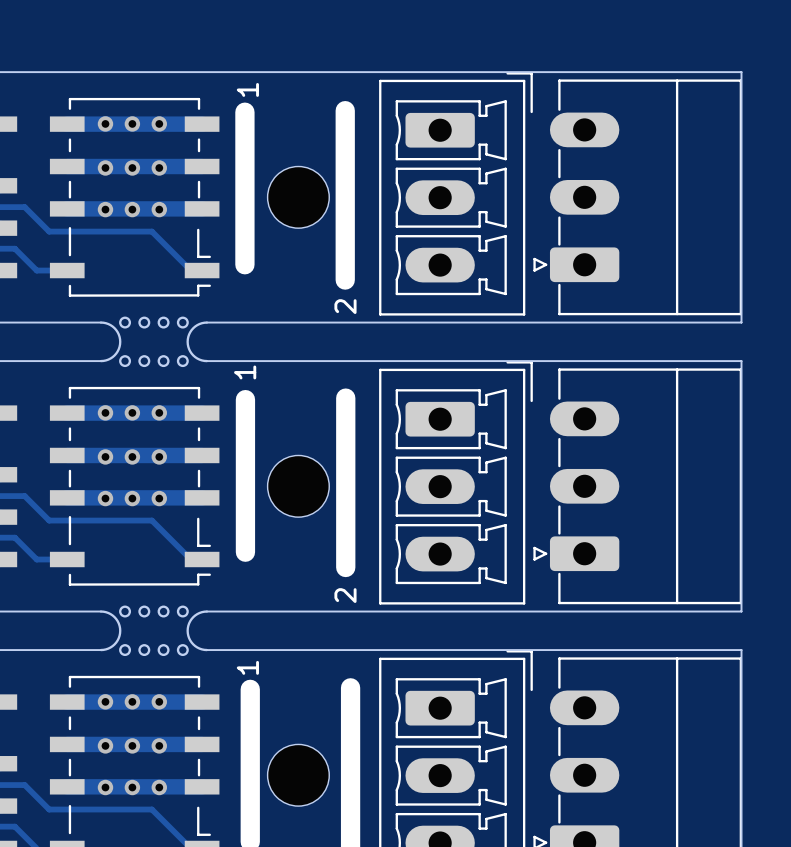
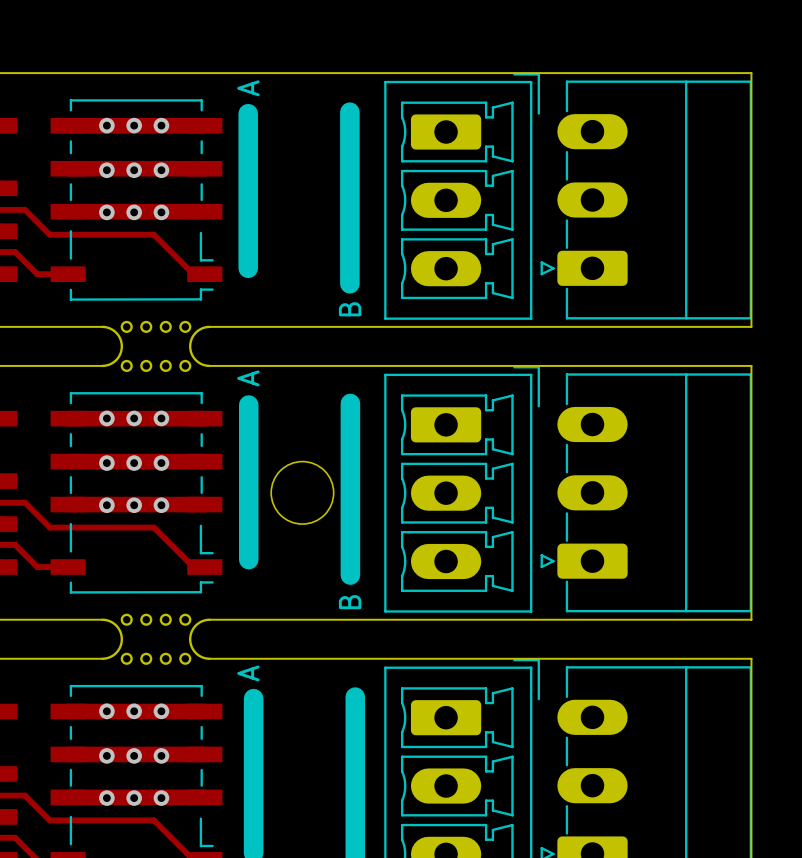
text: 1 (247, 89) -> A (248, 88)
part: (298, 197) -> none
text: 2 (345, 306) -> B (350, 309)
text: 1 (245, 372) -> A (248, 378)
text: 2 (345, 595) -> B (350, 602)
text: 1 (247, 667) -> A (248, 673)
part: (298, 775) -> none

